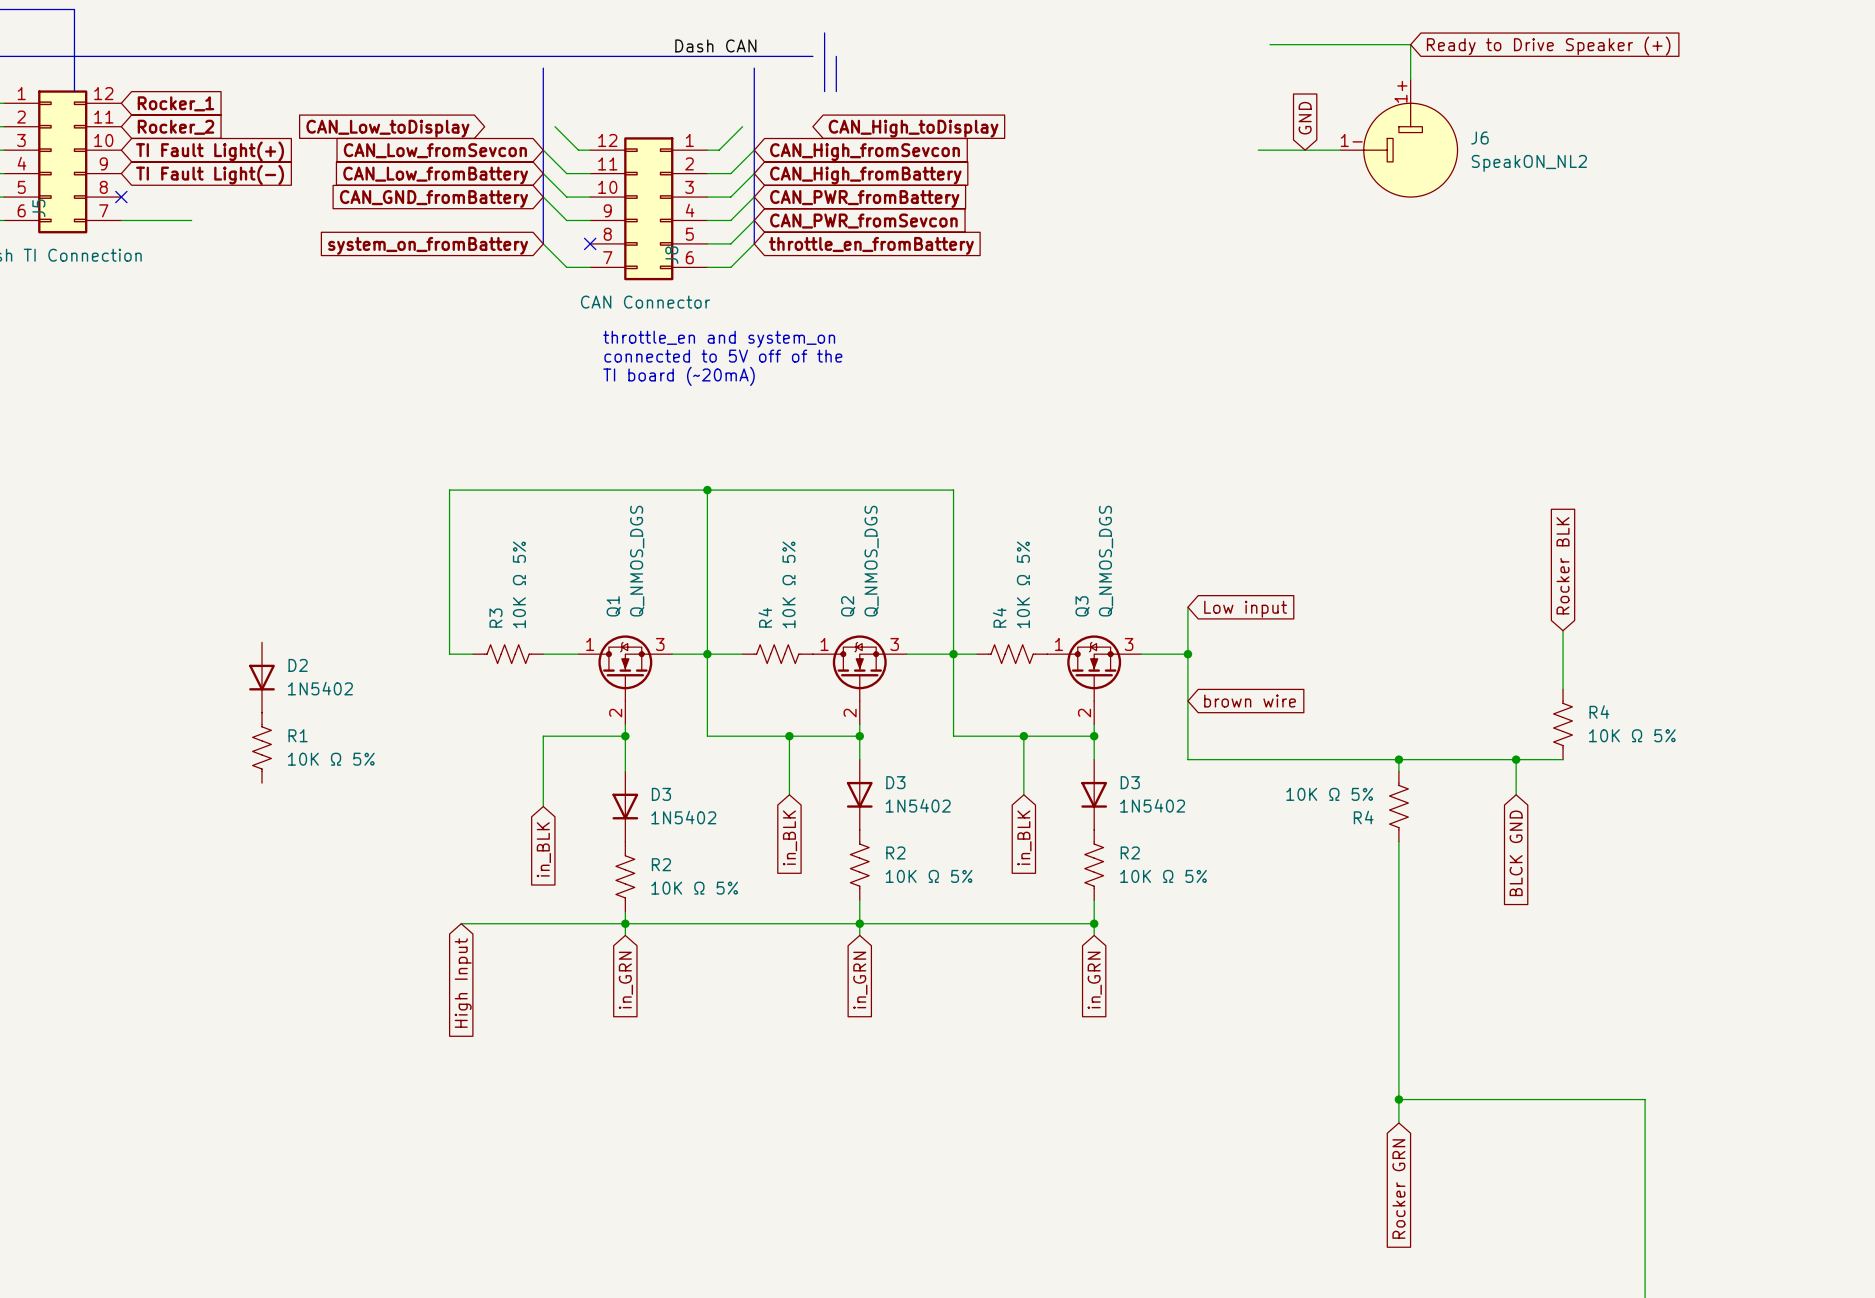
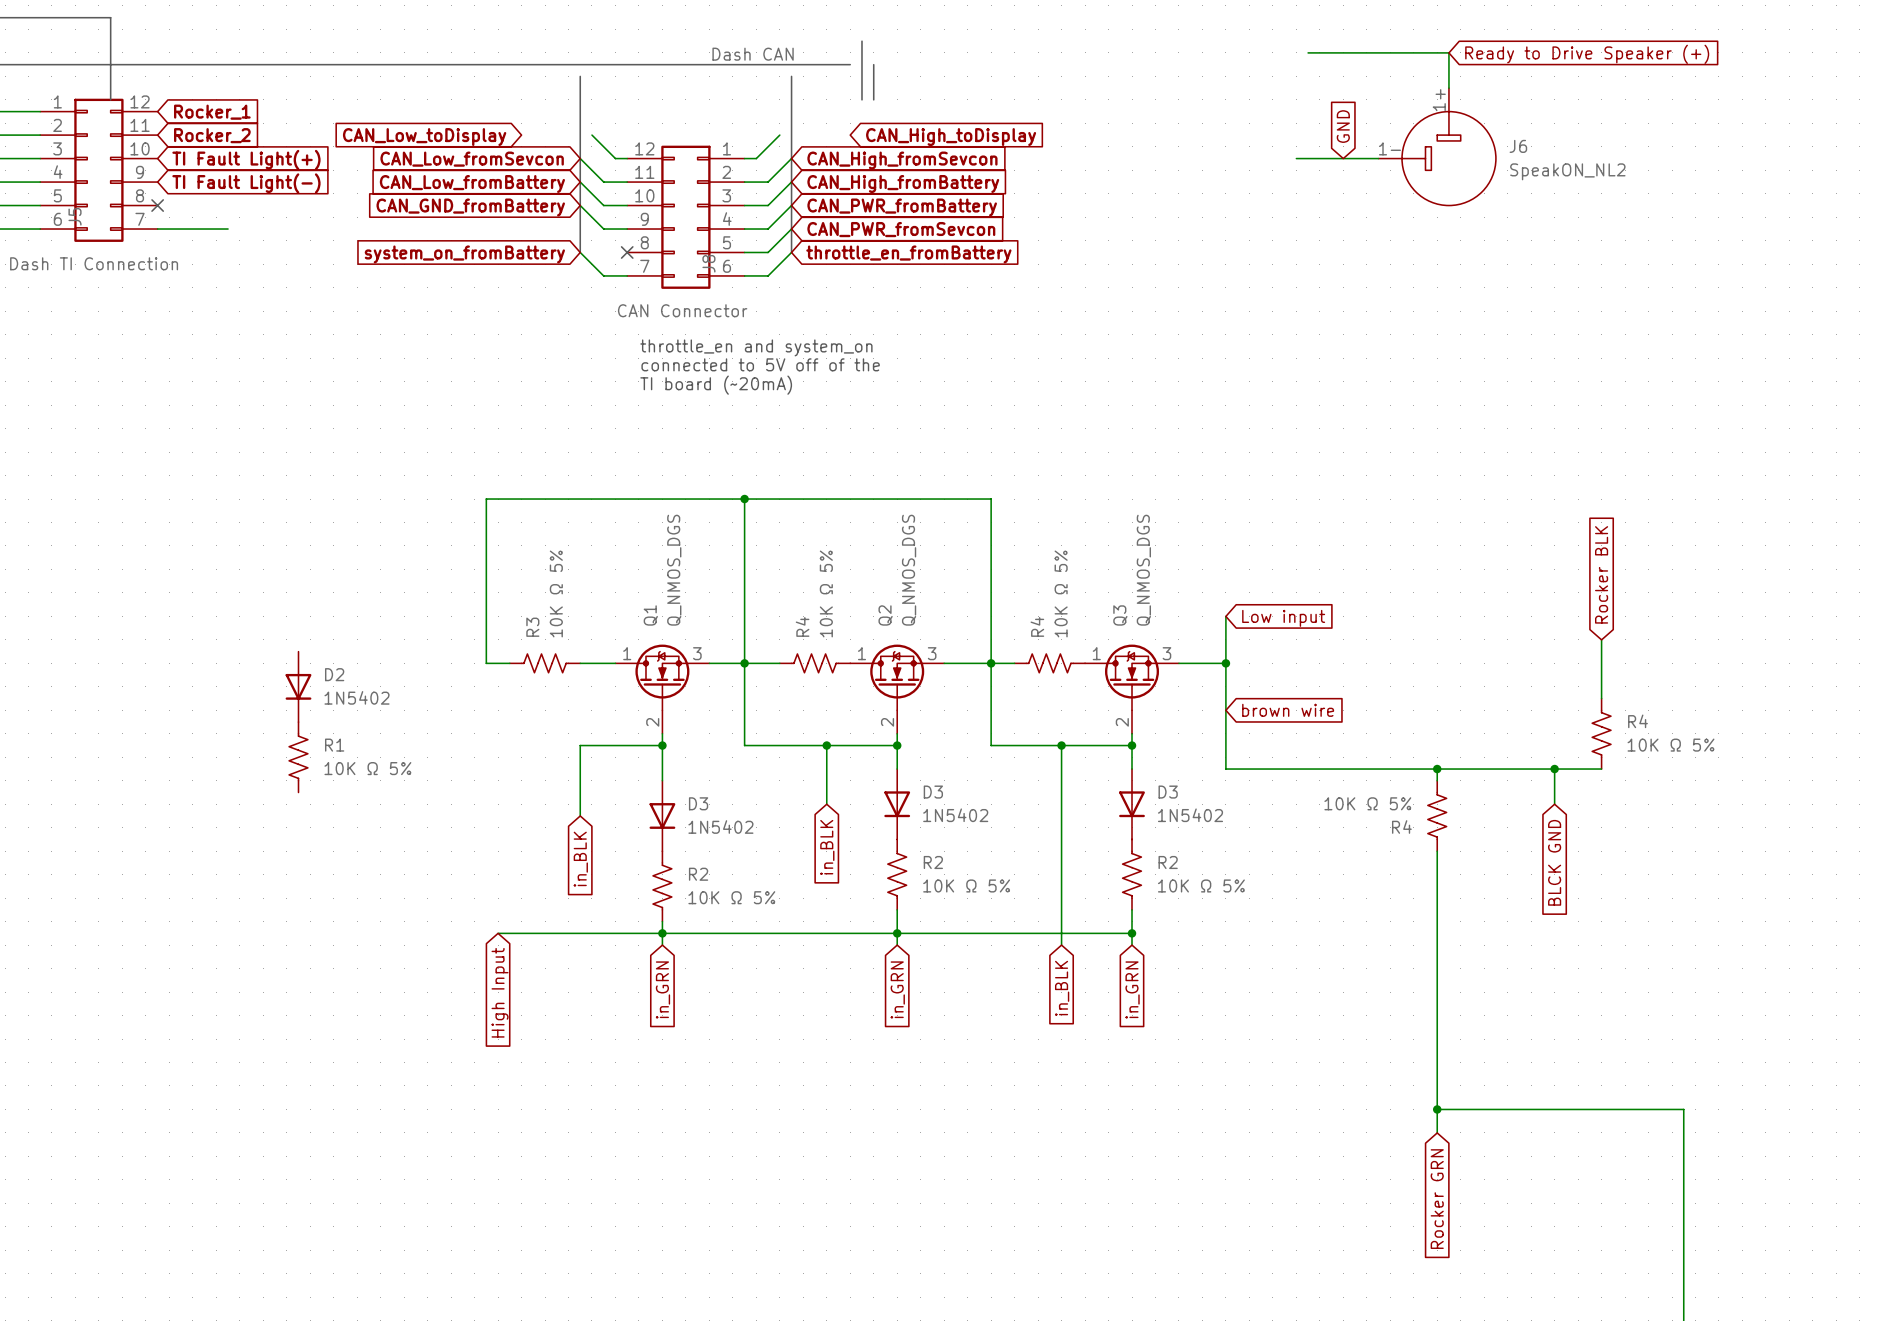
wire: none -> (1061, 804) (1061, 945)
global label position: in_BLK (1024, 837) -> in_BLK (1062, 988)

